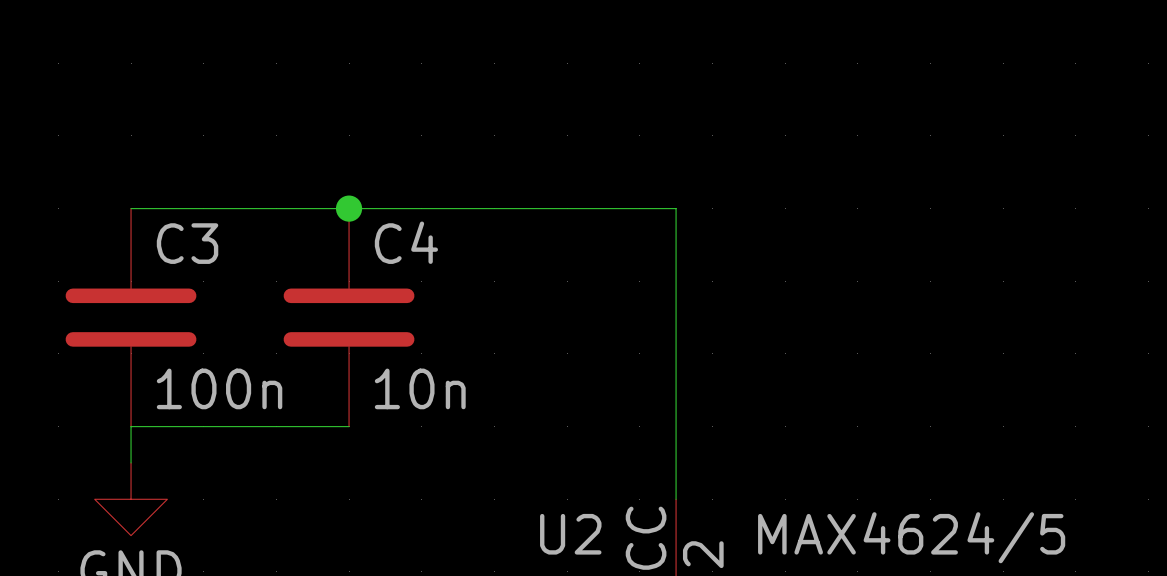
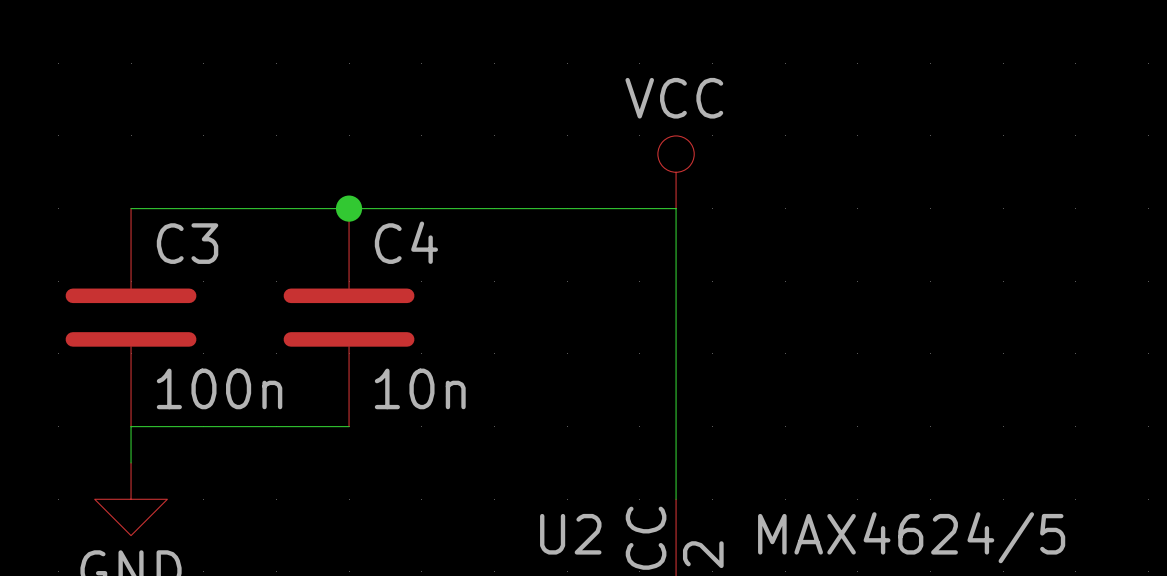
power symbol: none -> VCC (676, 172)

